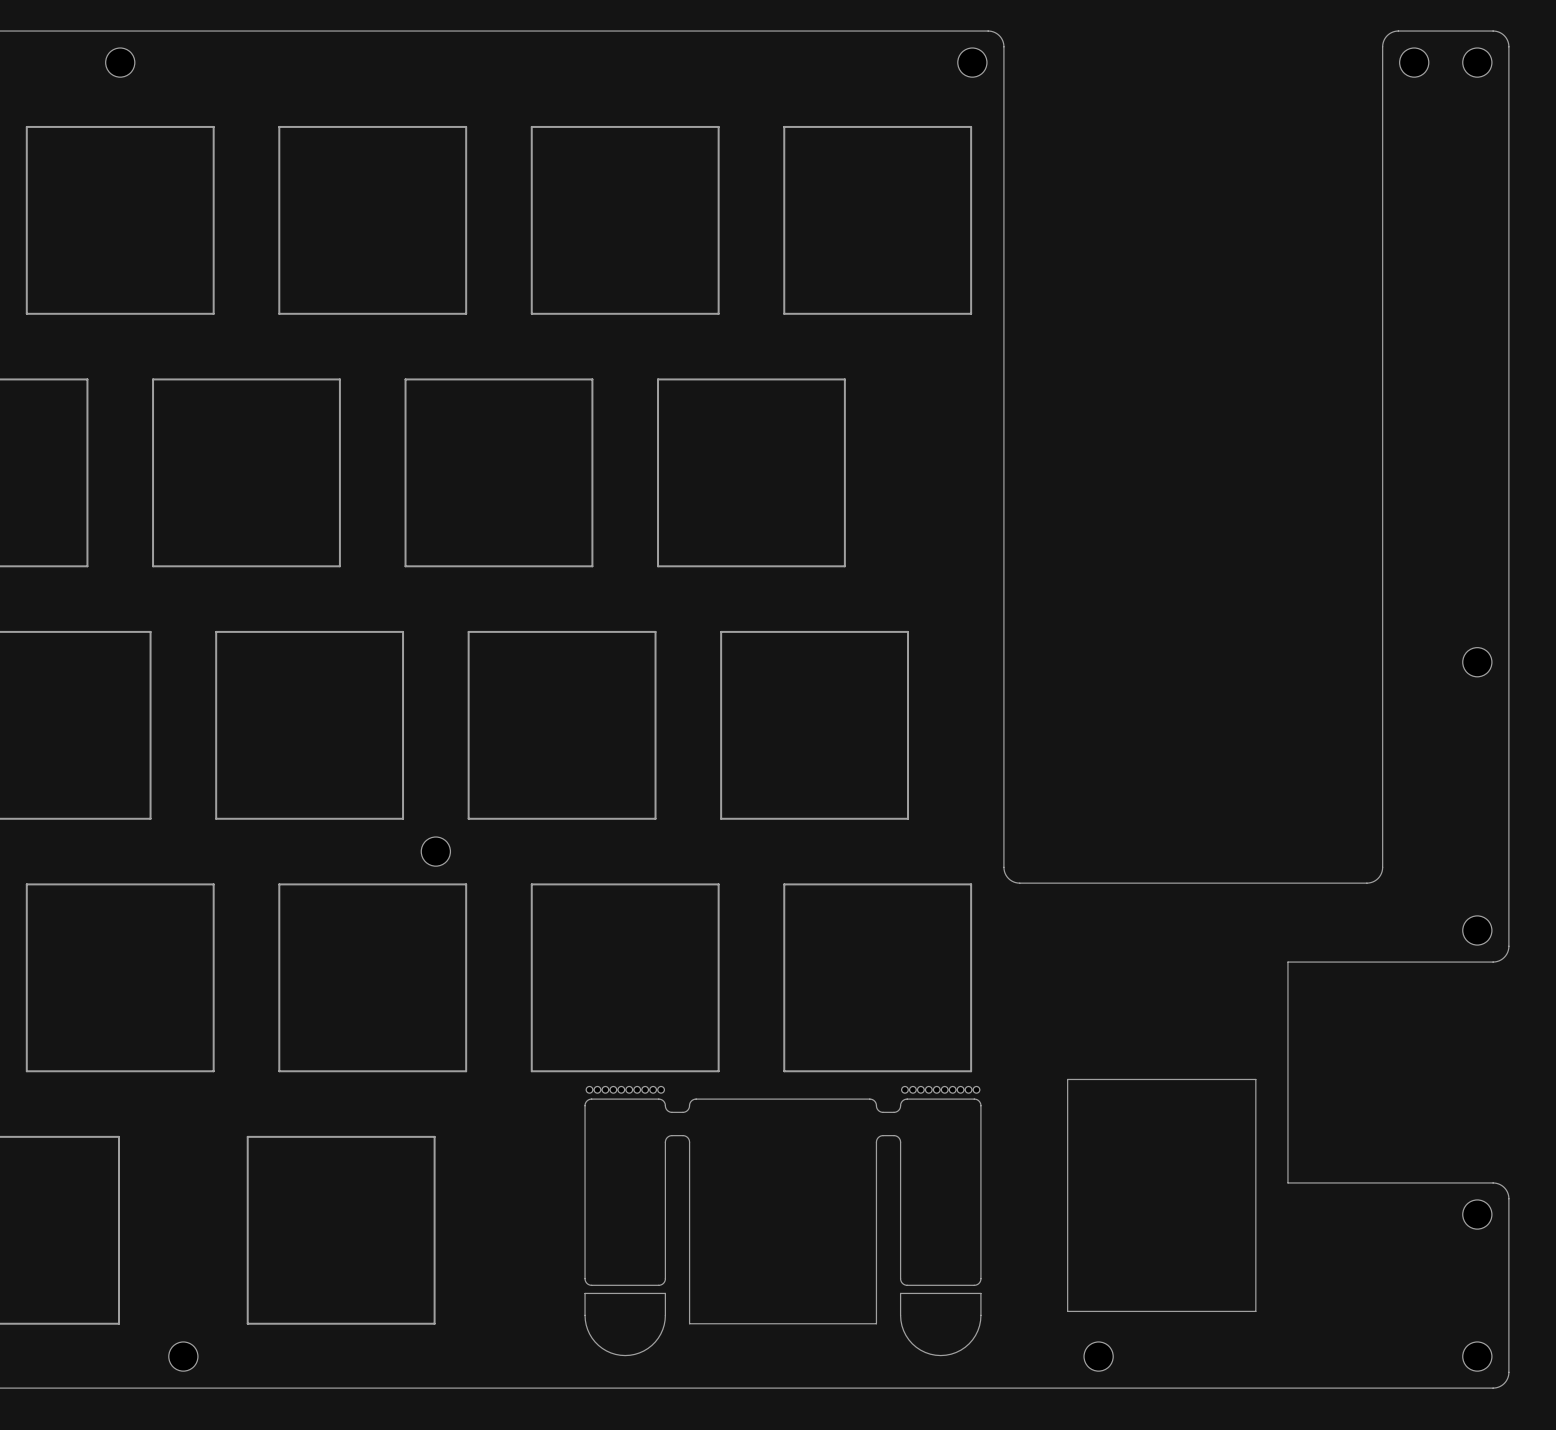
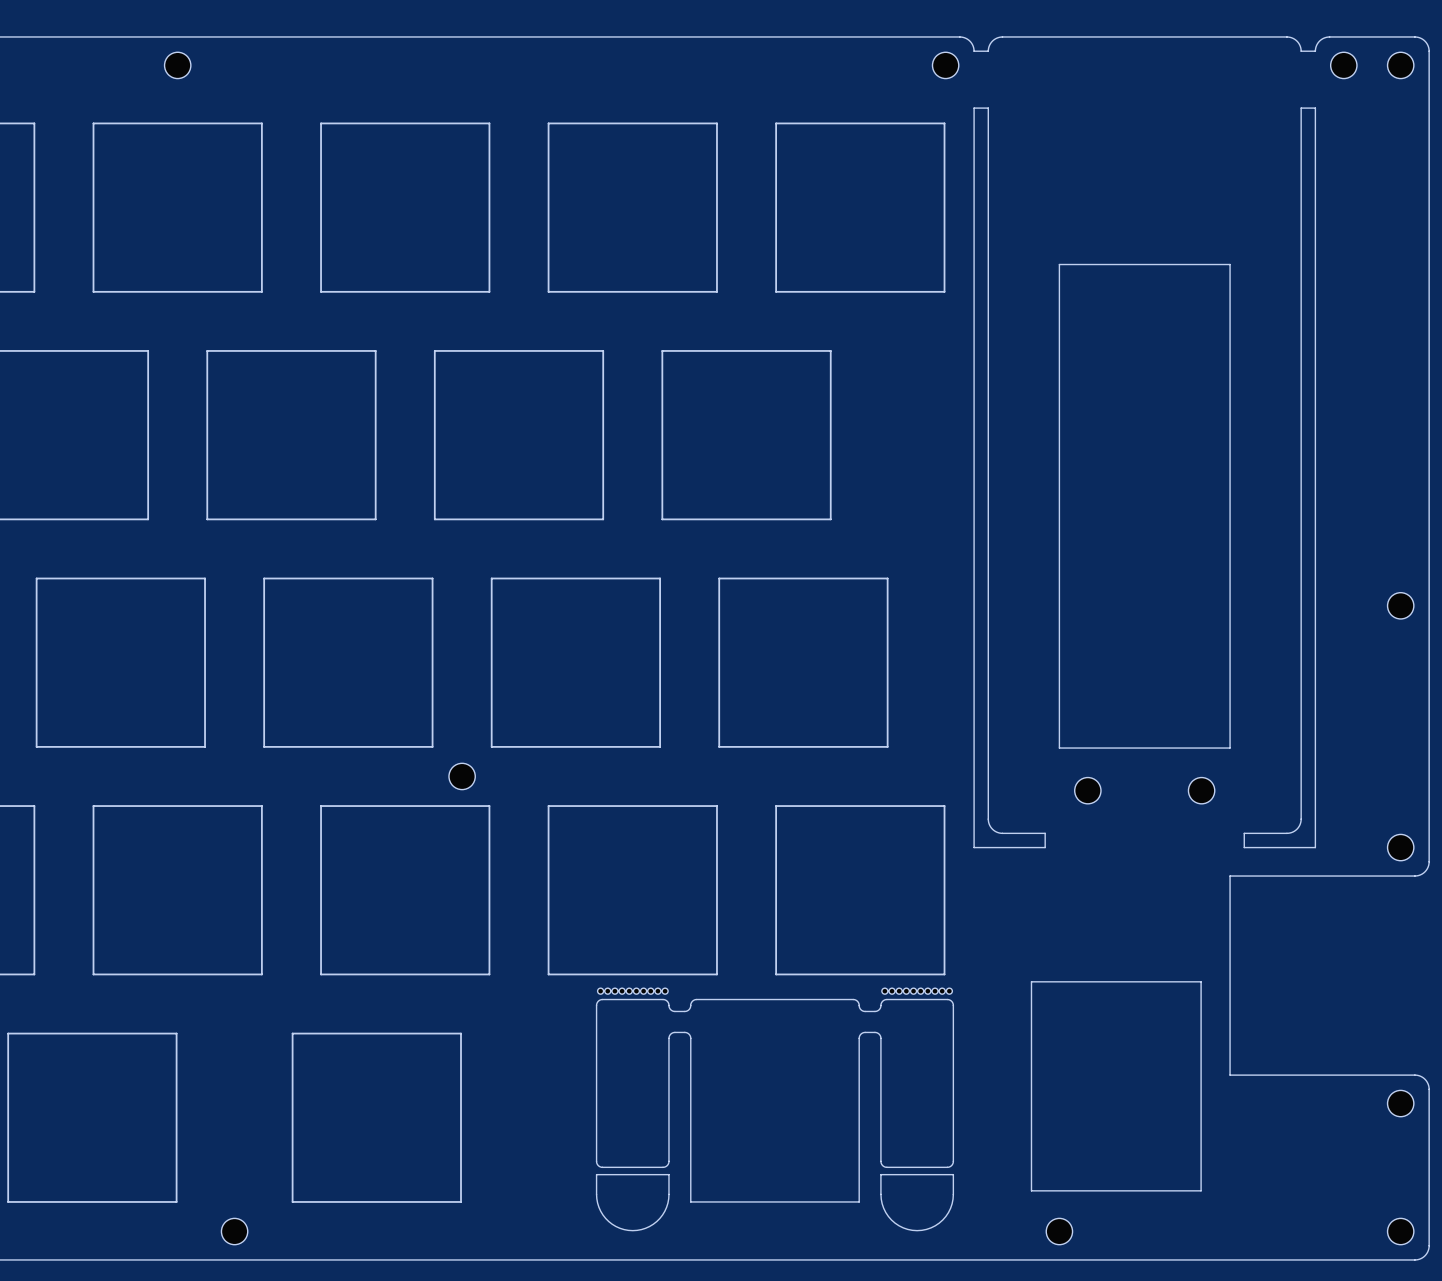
board edge: (1003, 46) (1003, 109) -> (974, 51) (988, 51) (992, 41) (1002, 36)
board edge: (1382, 46) (1382, 109) -> (1315, 51) (1301, 51) (1296, 41) (1286, 36) (1002, 36)
board edge: none -> (1059, 264) (1230, 264) (1230, 748) (1059, 748) (1059, 264)
board edge: (1003, 867) (1008, 878) (1019, 883) -> (974, 790) (974, 847) (1045, 847) (1045, 833) (999, 832) (991, 827) (988, 820) (988, 108) (974, 108)
part: none -> (1087, 790)
part: none -> (1201, 790)
board edge: (1382, 867) (1378, 878) (1366, 883) (1019, 883) -> (1315, 790) (1315, 847) (1244, 847) (1244, 833) (1290, 832) (1296, 829) (1301, 820) (1301, 108) (1315, 108)

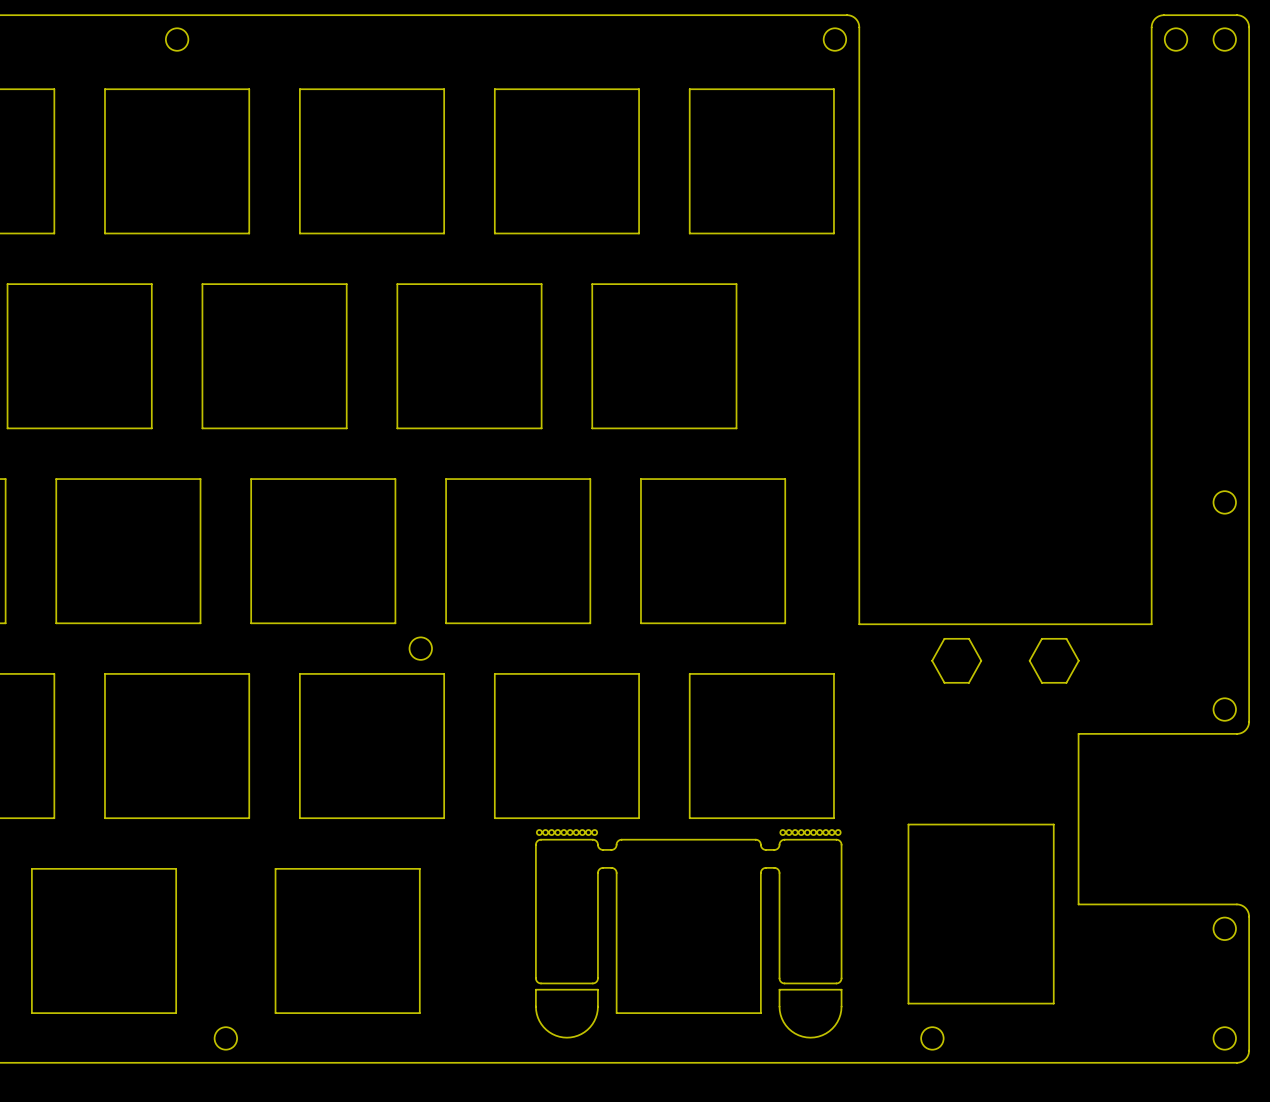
board edge: (1002, 36) (992, 41) (988, 51) (974, 51) -> (859, 76) (859, 27)
board edge: (1002, 36) (1286, 36) (1296, 41) (1301, 51) (1315, 51) -> (1151, 76) (1151, 27)
board edge: (974, 108) (988, 108) (988, 820) (991, 827) (999, 832) (1045, 833) (1045, 847) (974, 847) (974, 748) -> (932, 624) (859, 624)
board edge: (1315, 108) (1301, 108) (1301, 820) (1296, 829) (1290, 832) (1244, 833) (1244, 847) (1315, 847) (1315, 748) -> none
board edge: (1059, 748) (1059, 264) (1230, 264) (1230, 748) -> (1151, 624) (1078, 624)
drawing: none -> [931, 638, 982, 684]
drawing: none -> [1029, 638, 1080, 684]
part: (1087, 790) -> none
part: (1201, 790) -> none

